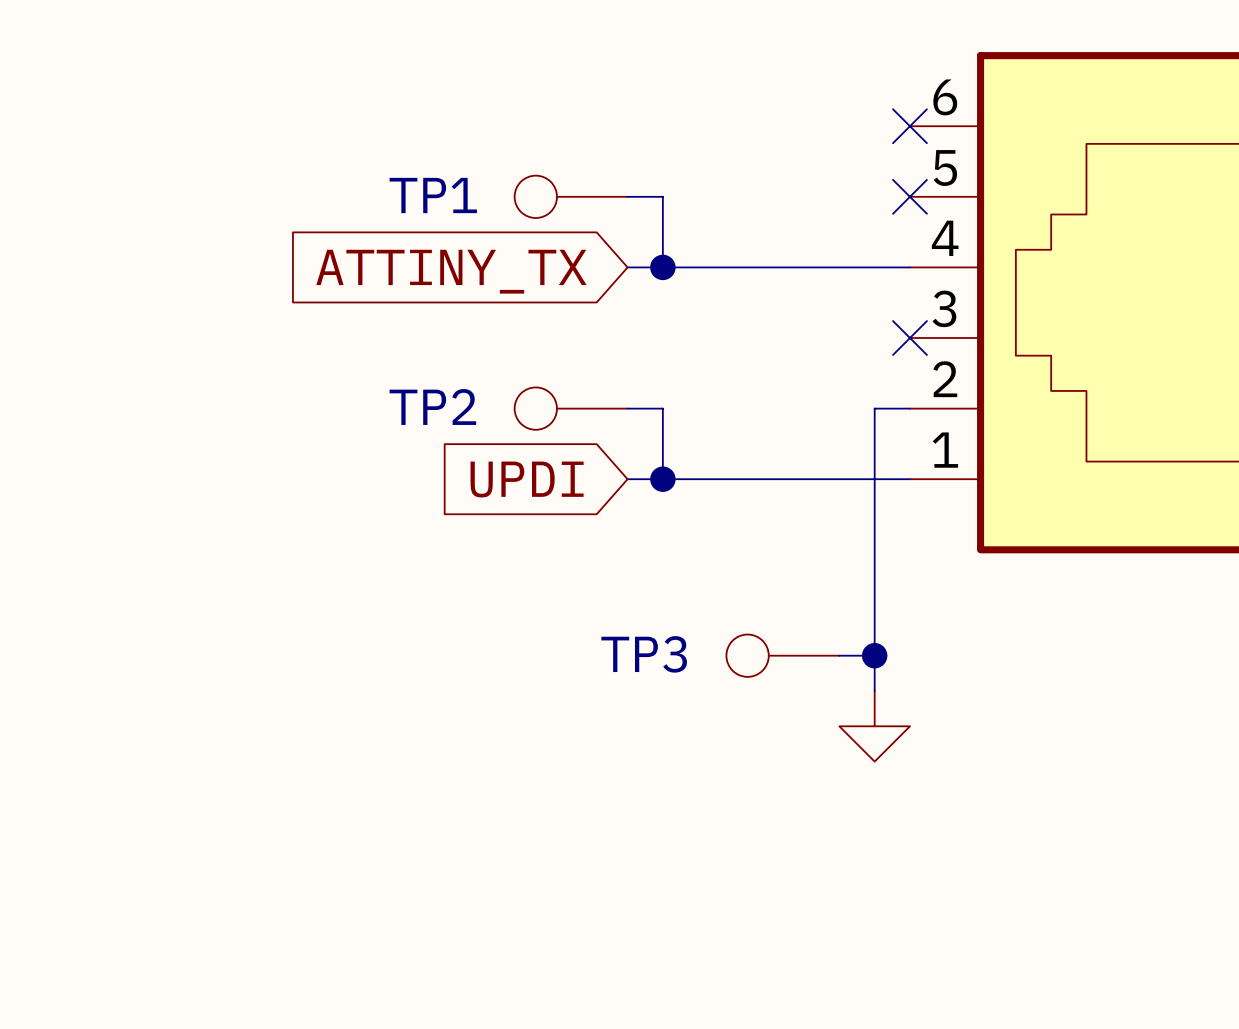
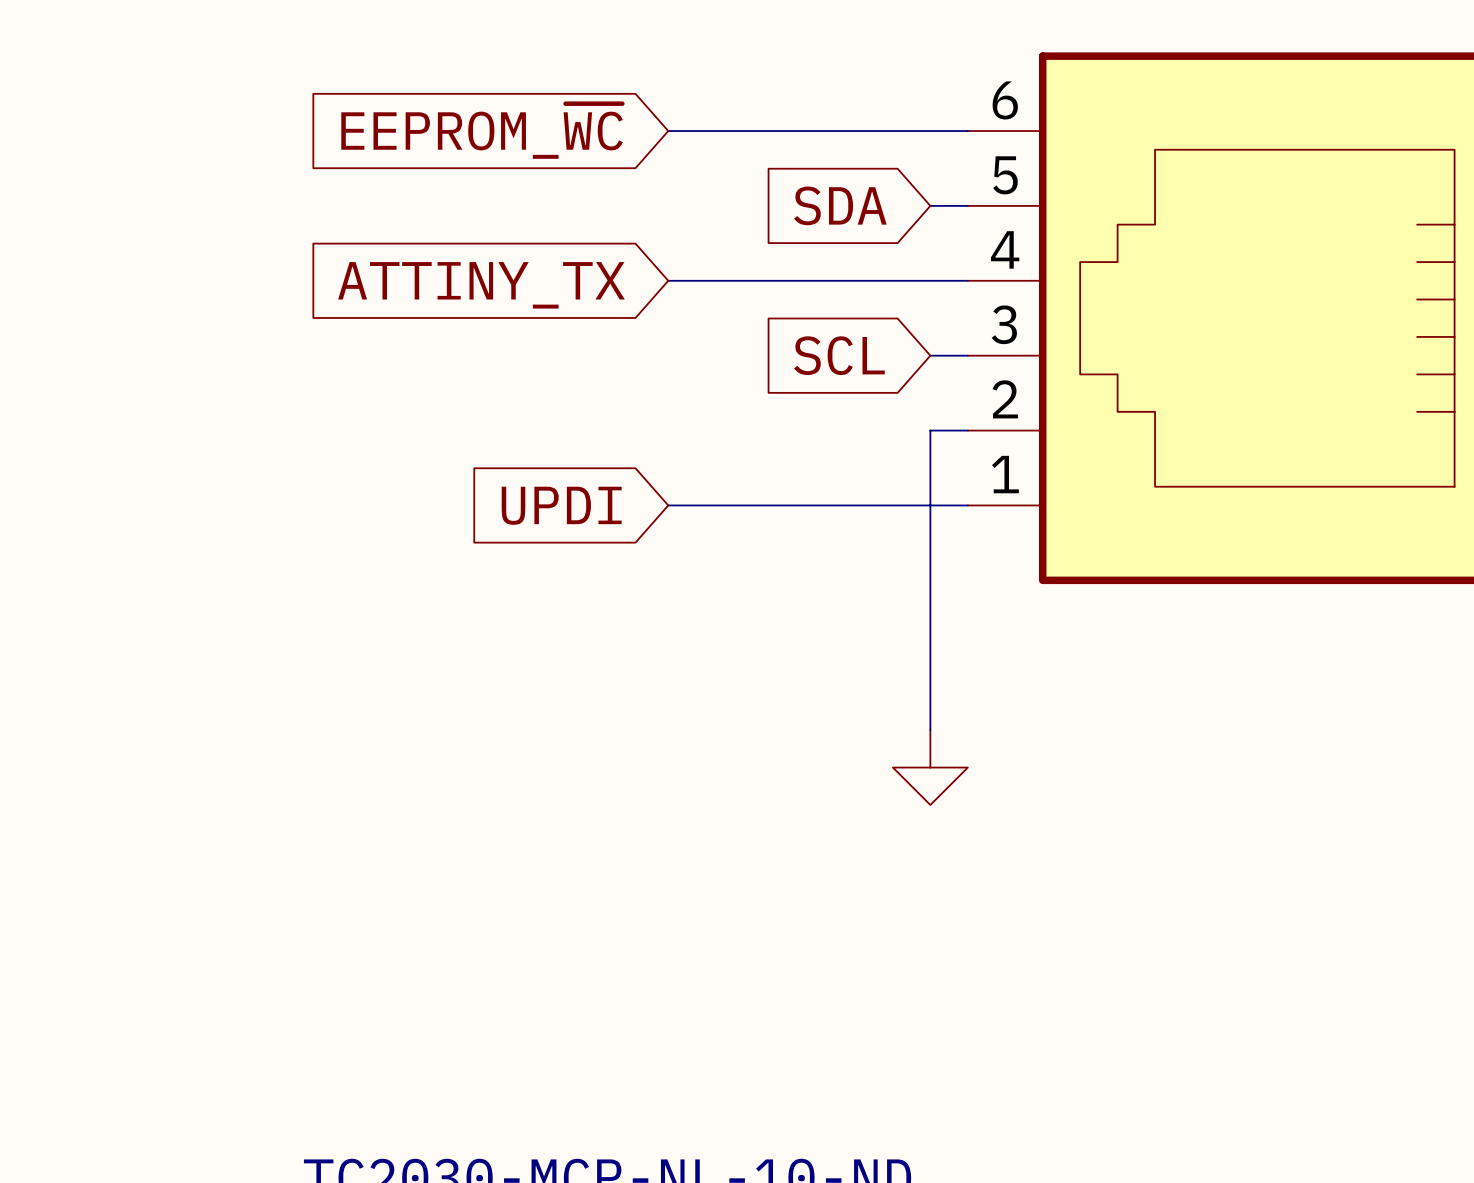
global label: none -> EEPROM_~{WC} (482, 131)
wire: none -> (668, 131) (967, 131)
no-connect mark: (909, 126) -> none
TP1: (571, 196) -> none
wire: (627, 196) (662, 196) (662, 267) -> none
global label: none -> SDA (840, 205)
wire: none -> (930, 205) (967, 205)
no-connect mark: (909, 196) -> none
junction: (662, 267) -> none
global label: none -> SCL (839, 355)
no-connect mark: (909, 338) -> none
TP2: (571, 408) -> none
wire: (627, 408) (662, 408) (662, 479) -> none
junction: (662, 479) -> none
TP3: (782, 655) -> none
wire: (839, 655) (874, 655) -> (930, 355) (967, 355)
junction: (874, 655) -> none

